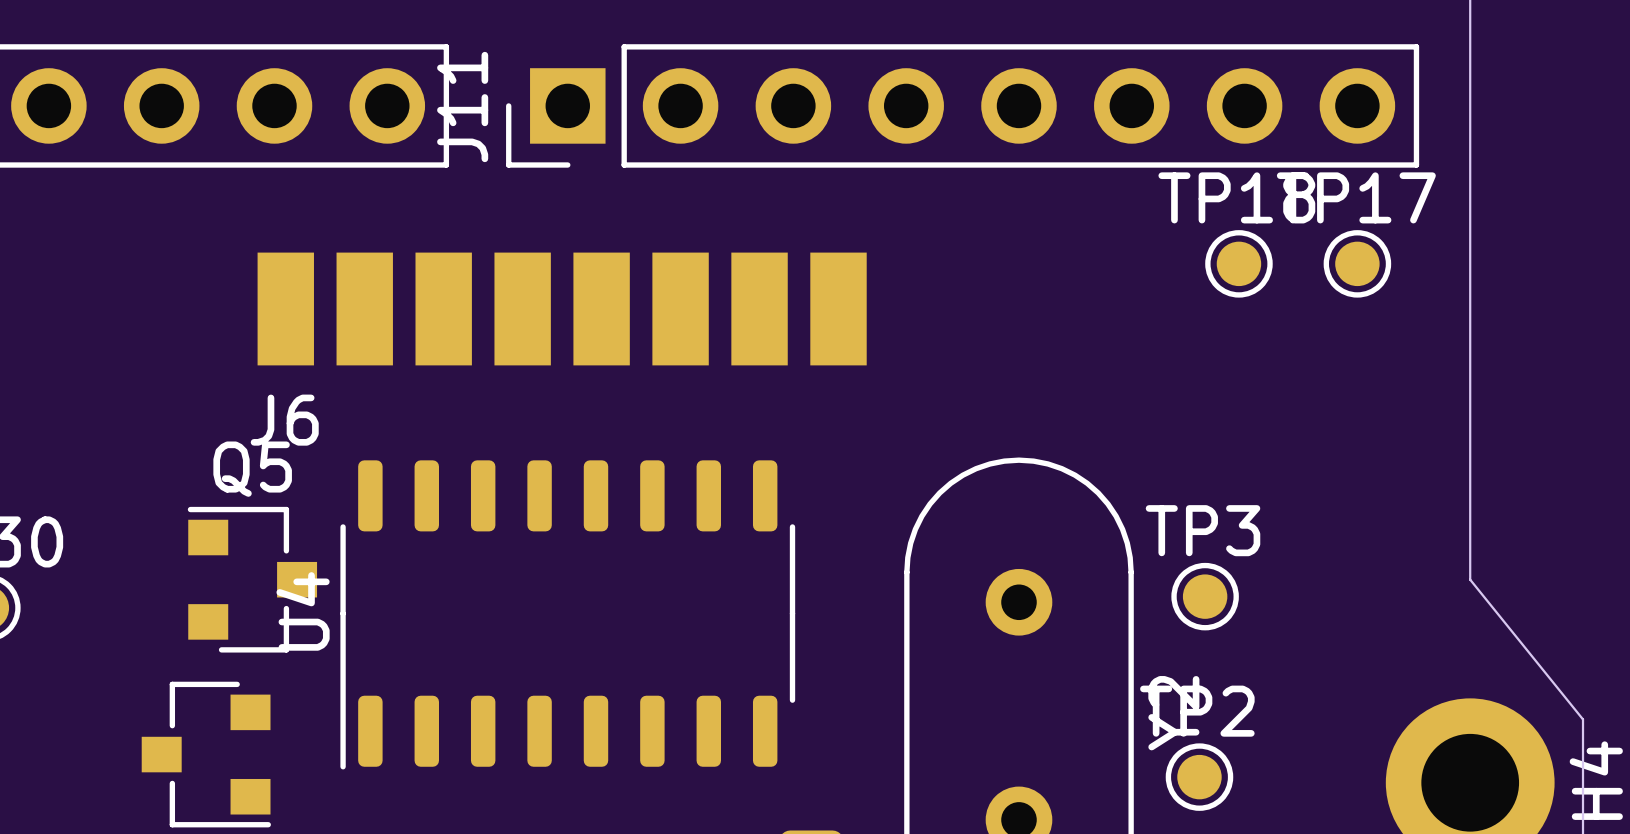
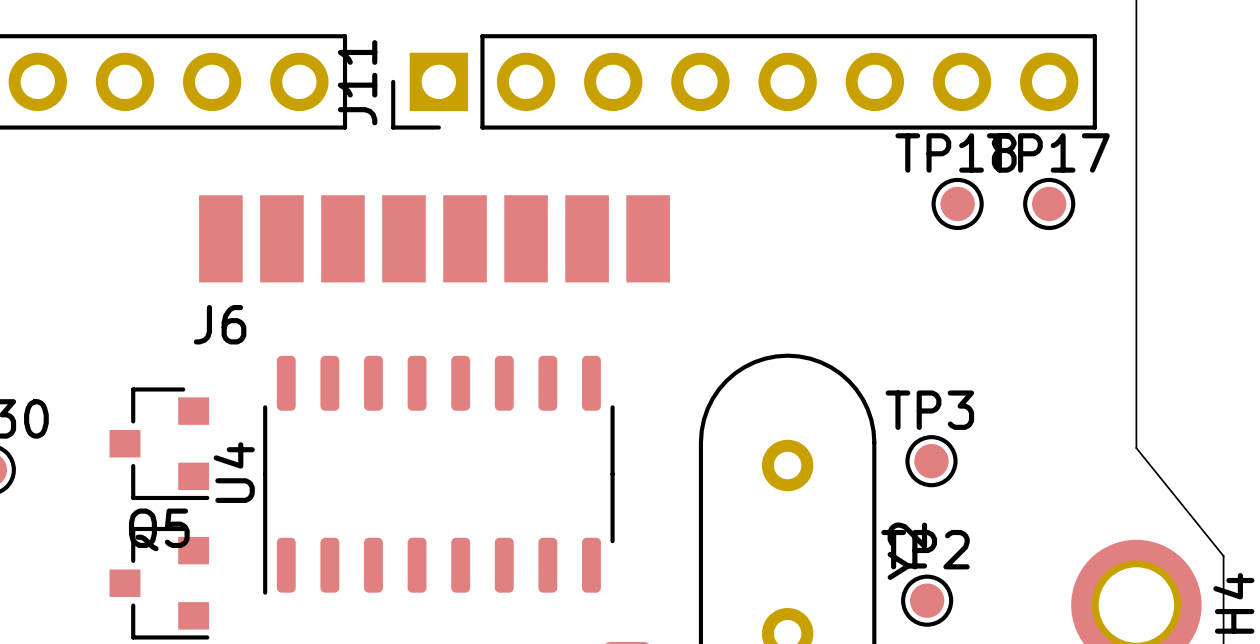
Q5 rotation: 0° (252, 579) -> 180° (159, 443)

